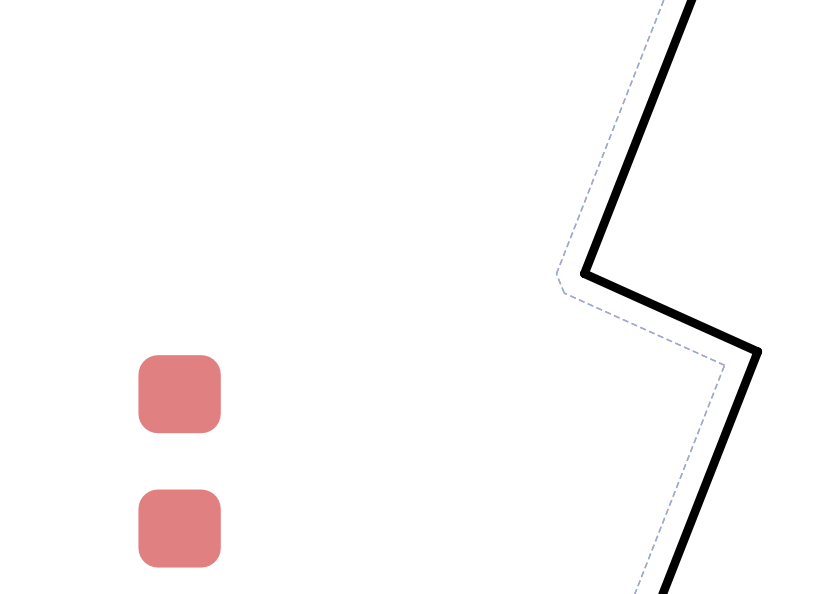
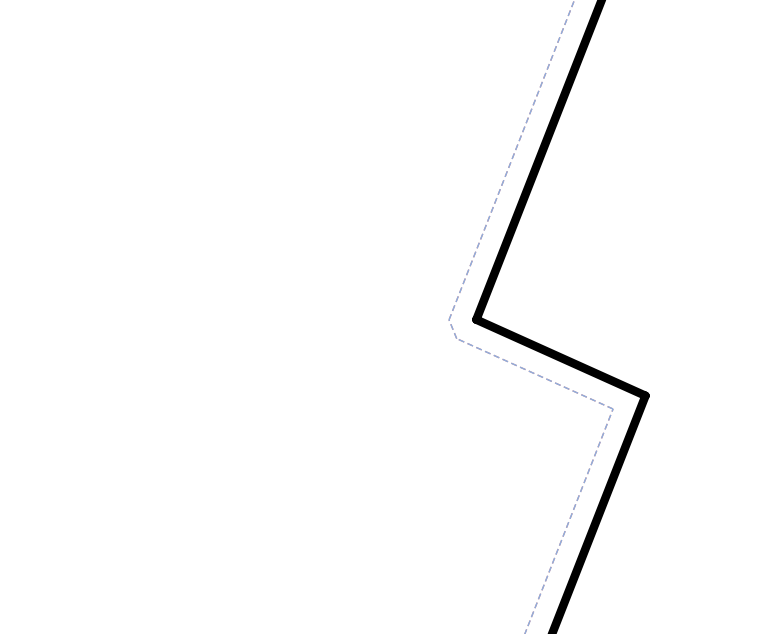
part: (179, 461) -> none

